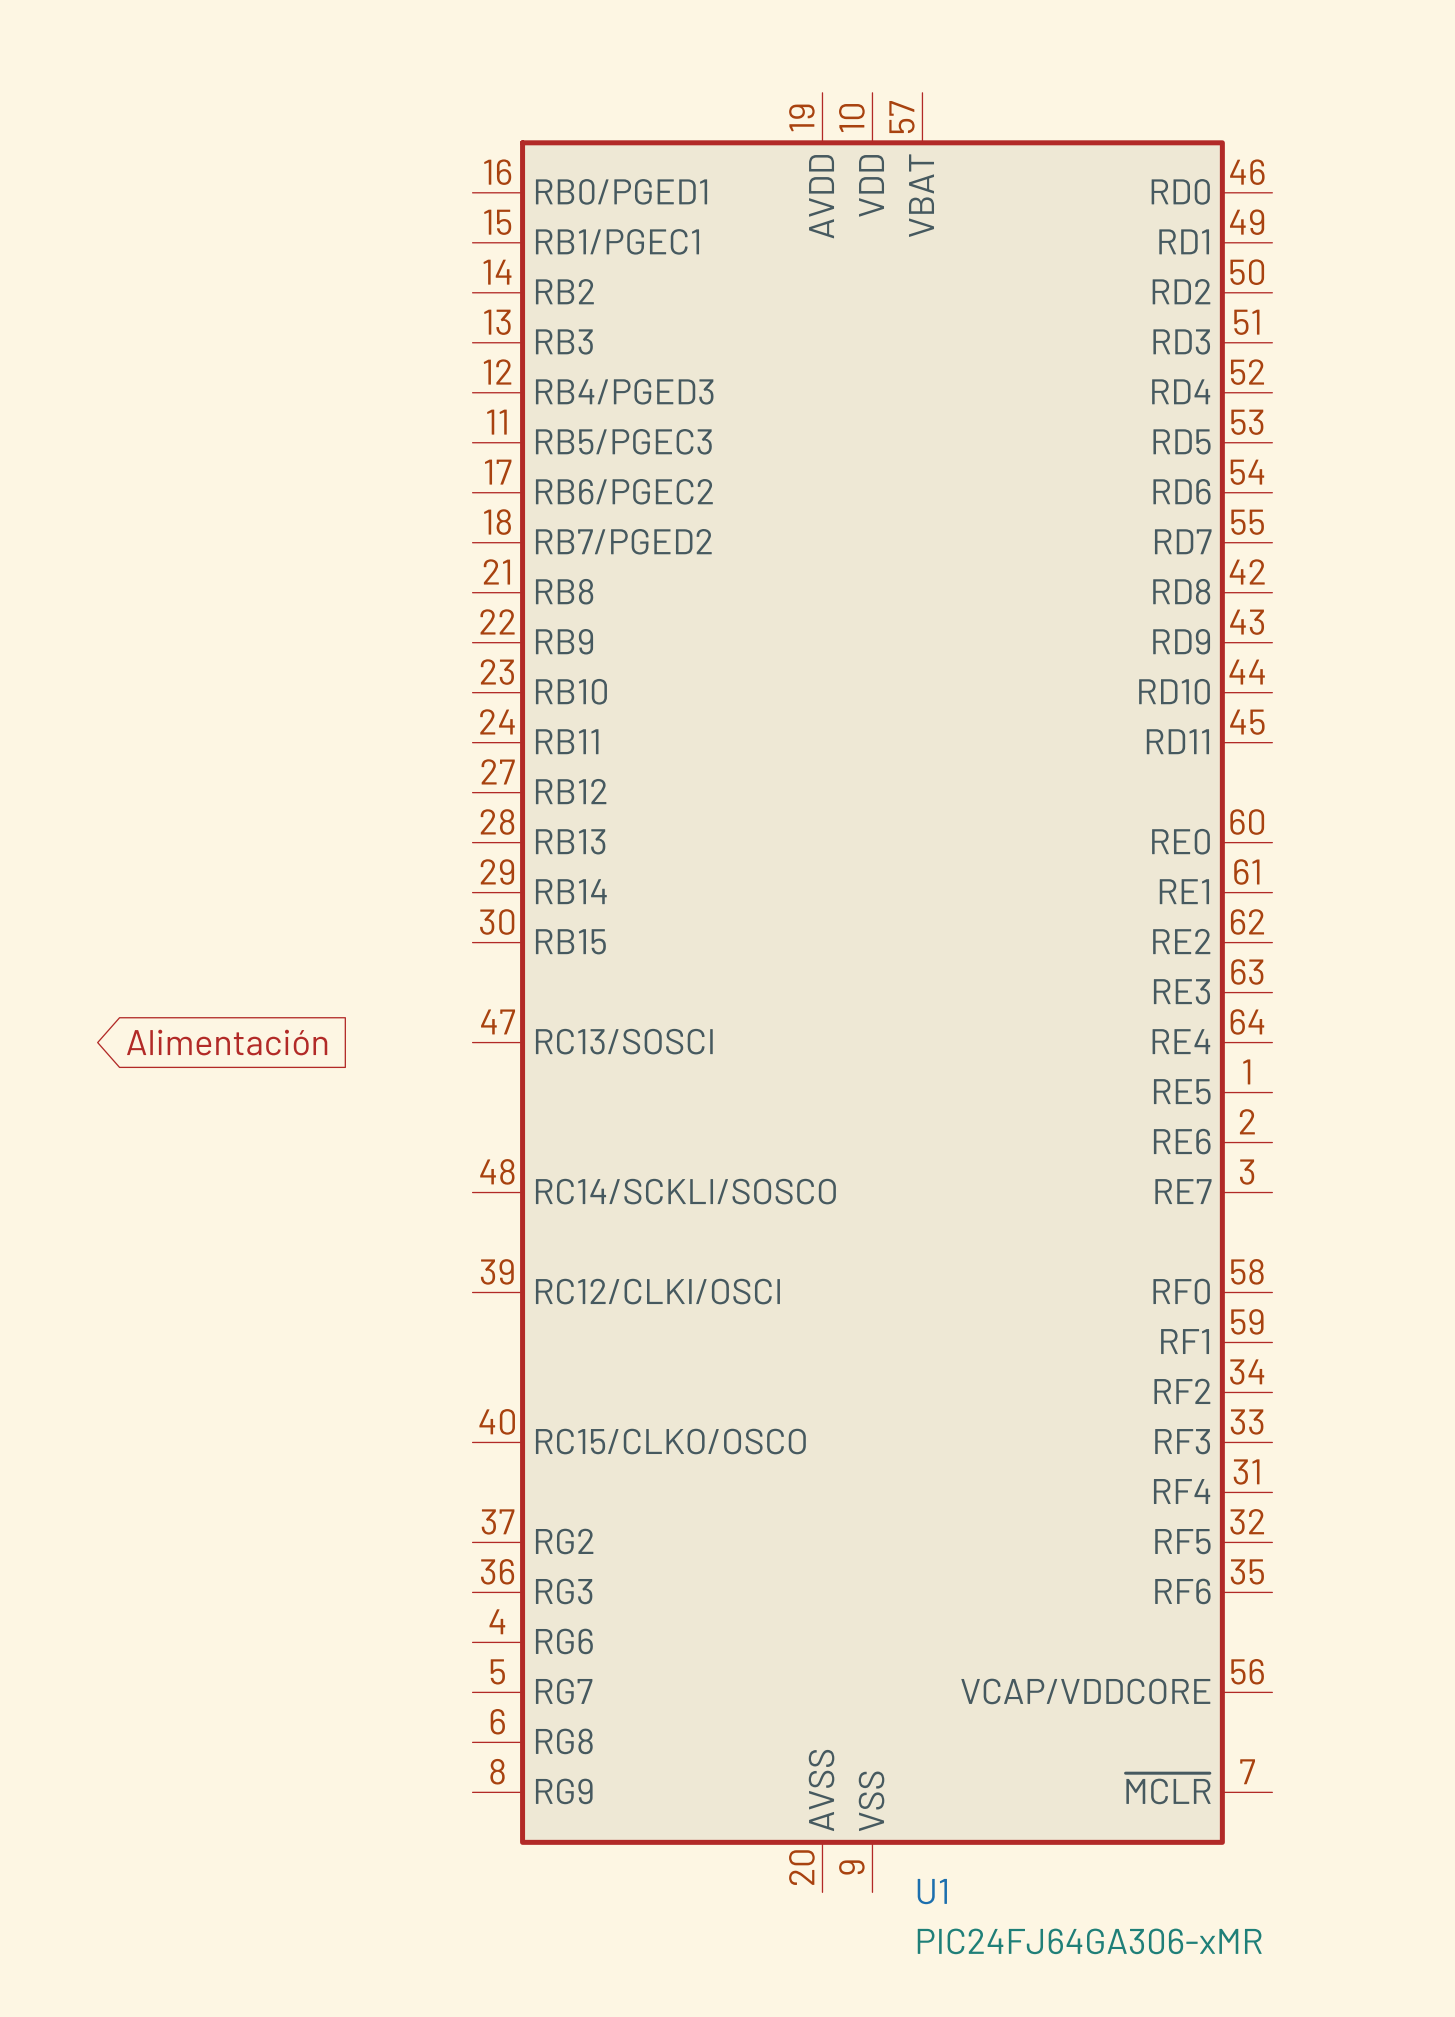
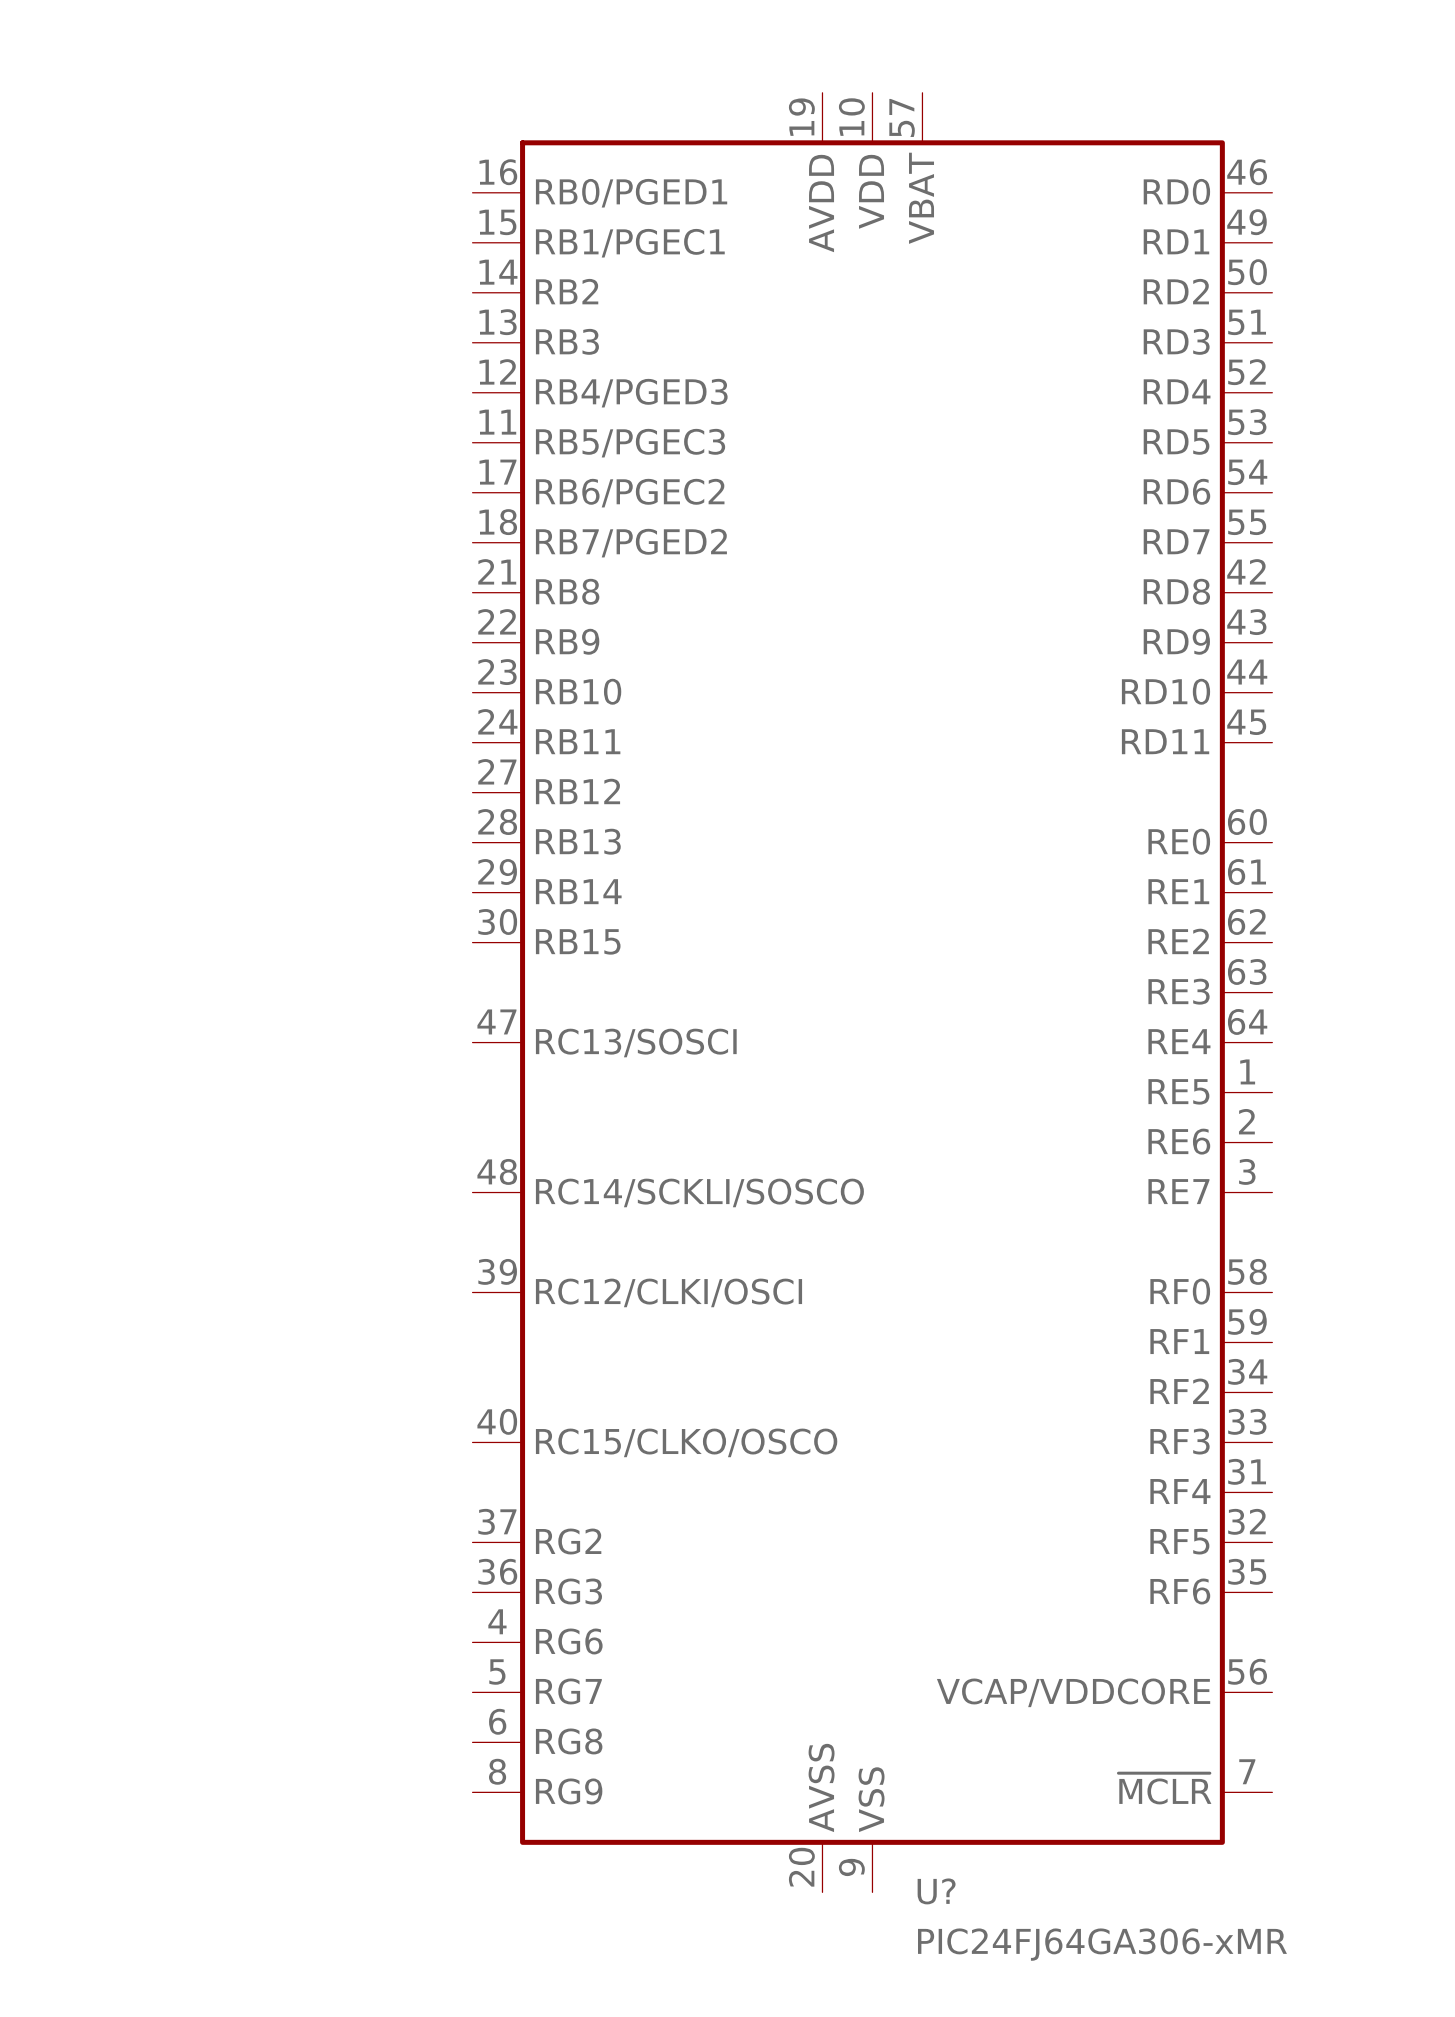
global label: Alimentación (227, 1042) -> none
U1 name: U1 (932, 1891) -> U? (936, 1891)

